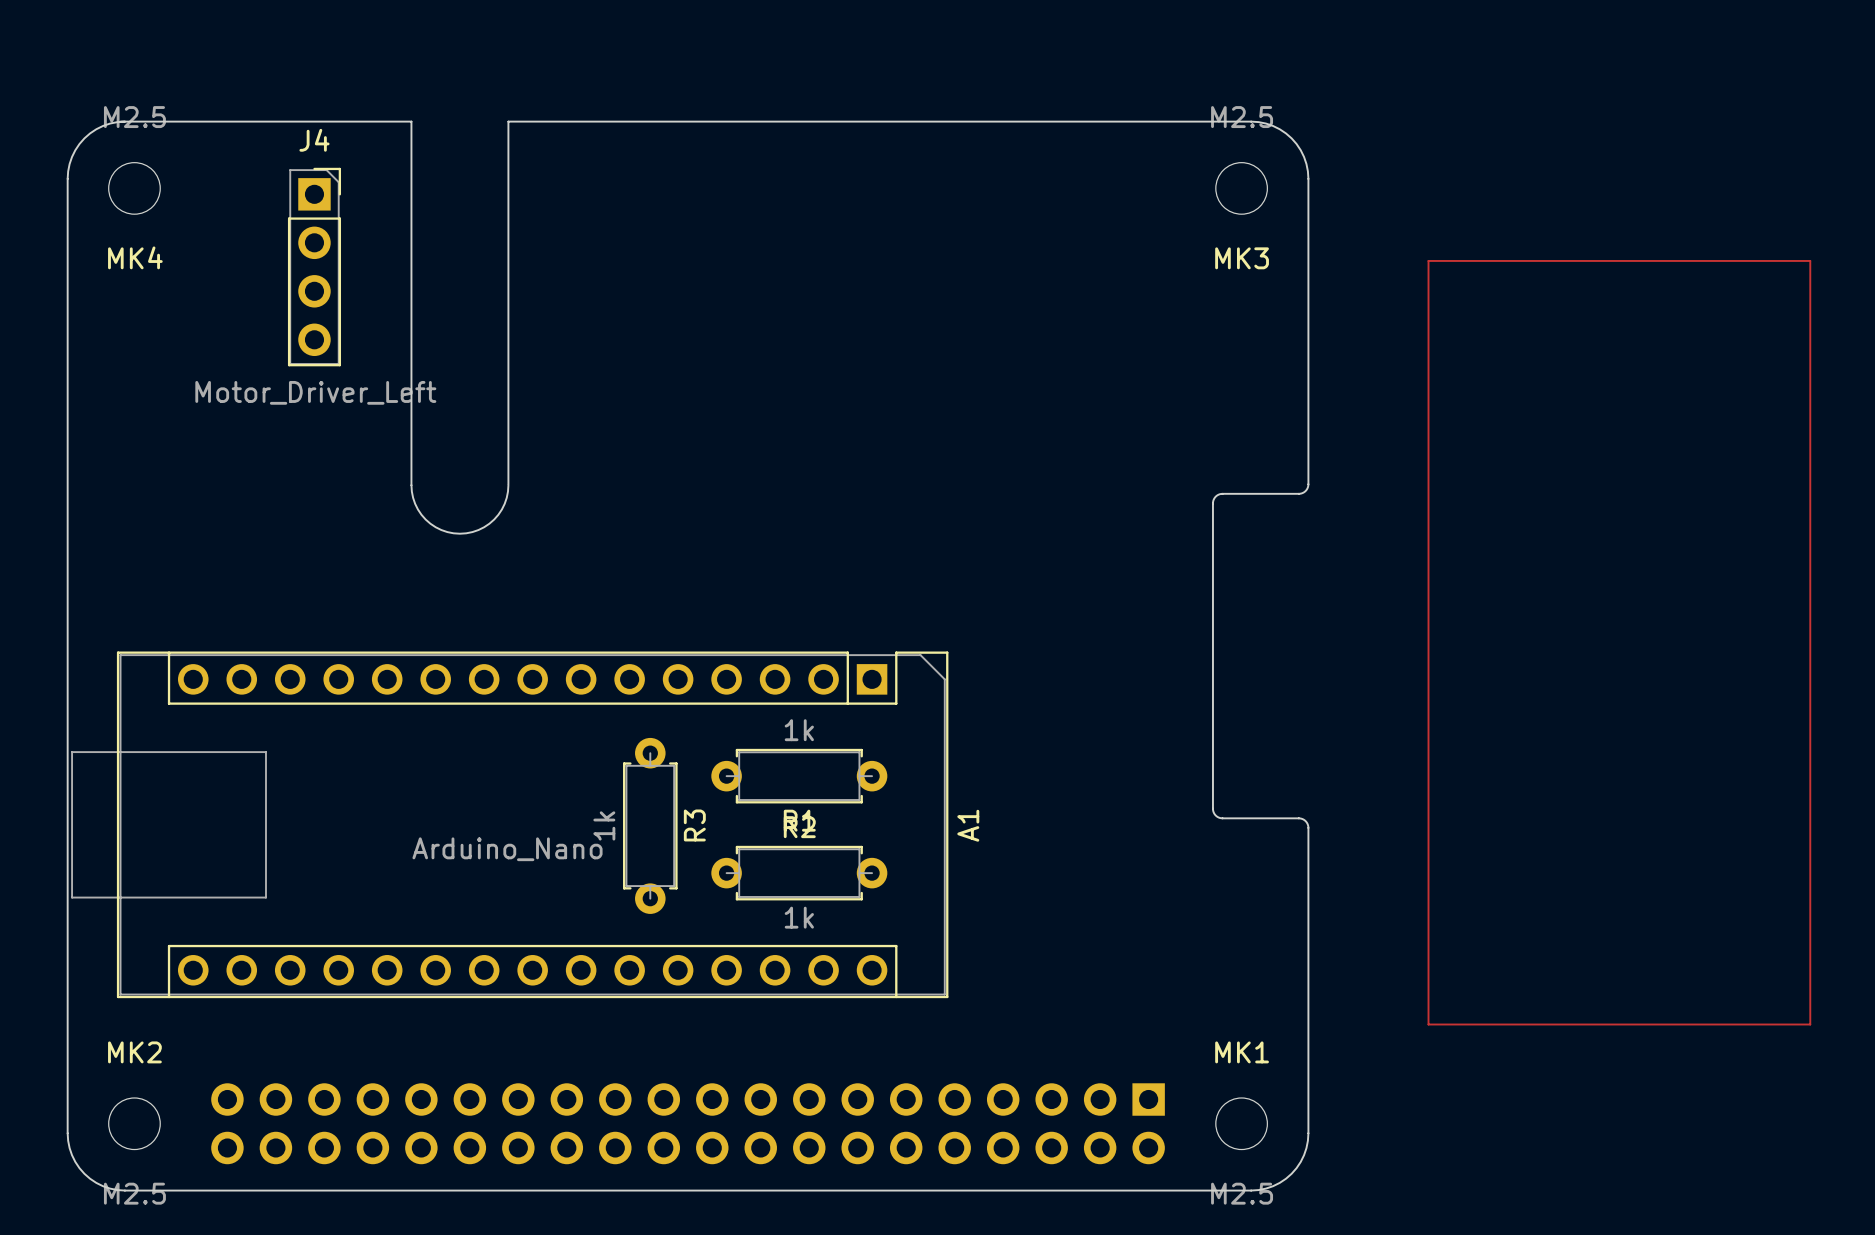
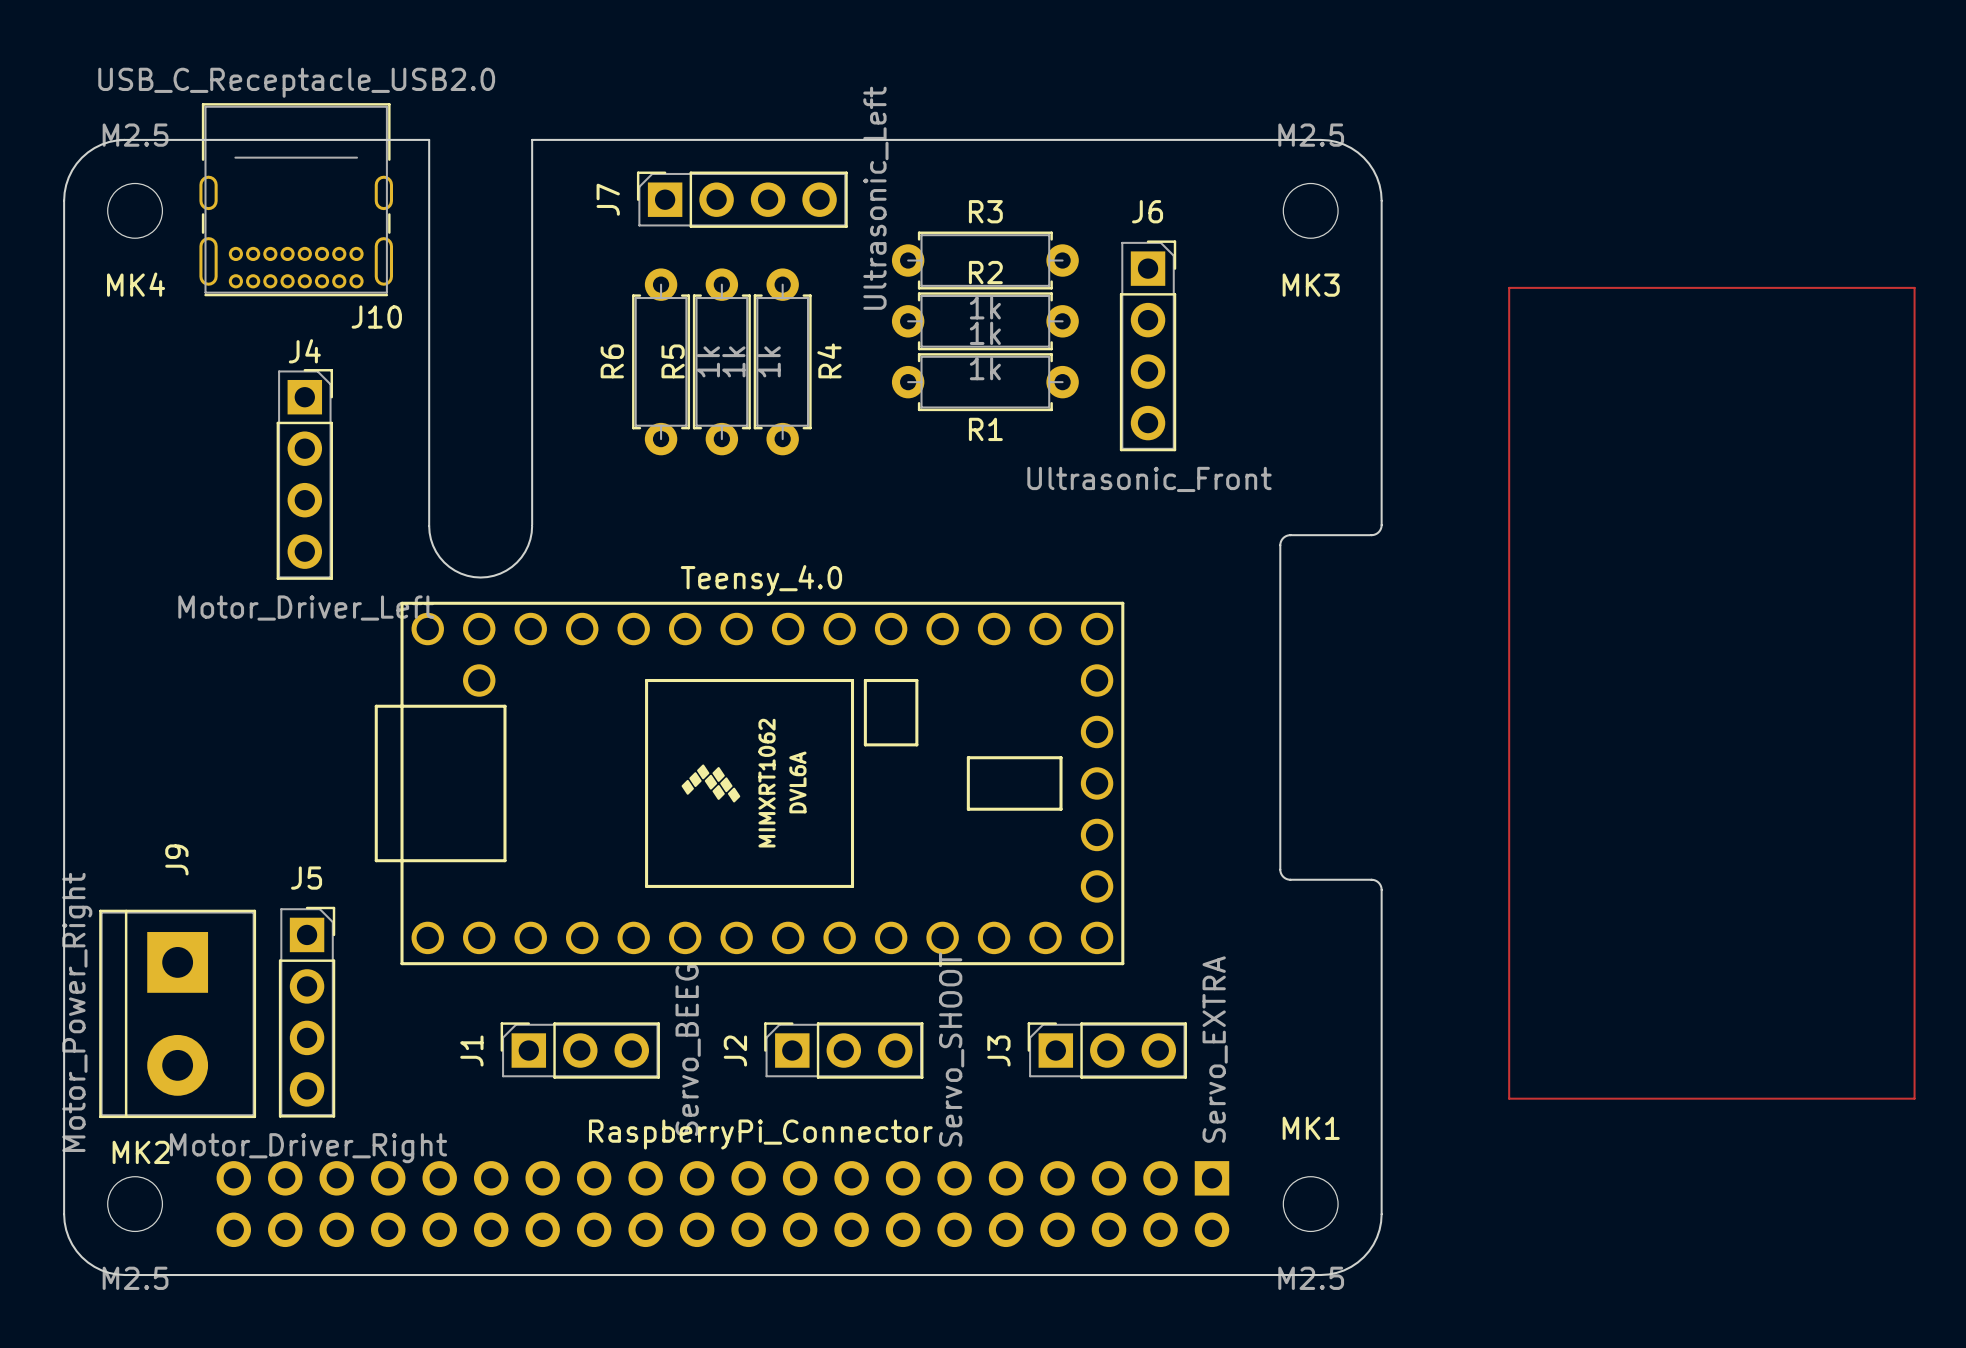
J4 name position: J4 (314, 140) -> J4 (304, 351)
J10: none -> USB_C_Receptacle_USB2.0 (296, 199)
J7: none -> Ultrasonic_Left (742, 199)
J4 position: (314, 267) -> (304, 474)
J6: none -> Ultrasonic_Front (1148, 345)
R6: none -> 1k (661, 361)
R5: none -> 1k (721, 361)
R4: none -> 1k (782, 361)
part: none -> Teensy_4.0 (749, 783)
R1 position: (799, 776) -> (985, 382)
A1: Arduino_Nano (509, 824) -> none
R3 value position: 1k (604, 825) -> 1k (985, 307)
R3 rotation: 0° (650, 825) -> 90° clockwise (985, 260)
R3 position: (650, 825) -> (985, 260)
R3 name position: R3 (694, 825) -> R3 (985, 211)
R2 position: (799, 873) -> (985, 321)
J5: none -> Motor_Driver_Right (307, 1012)
J9: none -> Motor_Power_Right (177, 1013)
J1: none -> Servo_BEEG (580, 1050)
J2: none -> Servo_SHOOT (843, 1050)
J3: none -> Servo_EXTRA (1107, 1050)
MK2 name position: MK2 (134, 1052) -> MK2 (141, 1152)
part value: none -> RaspberryPi_Connector (760, 1134)

